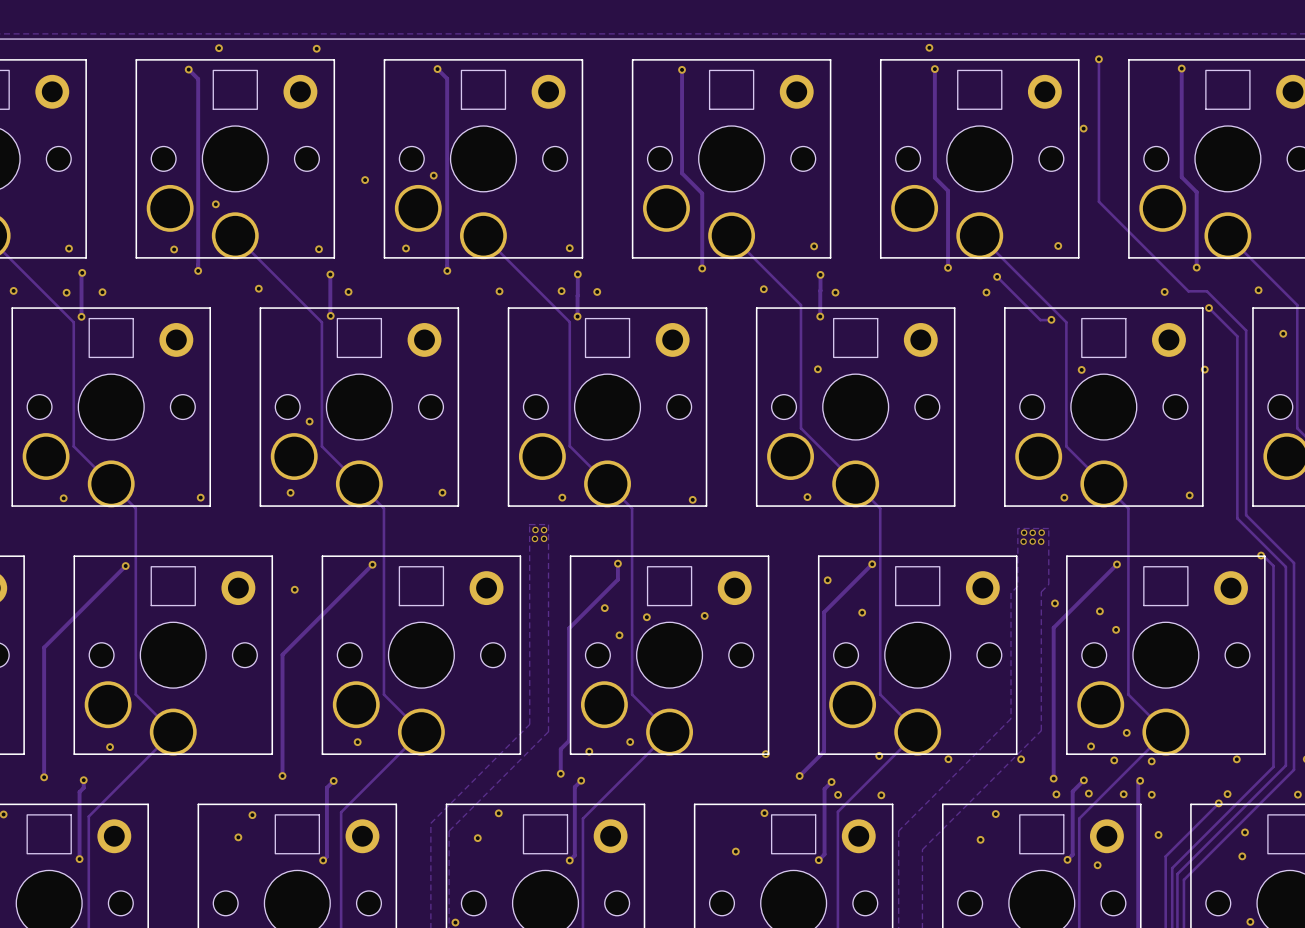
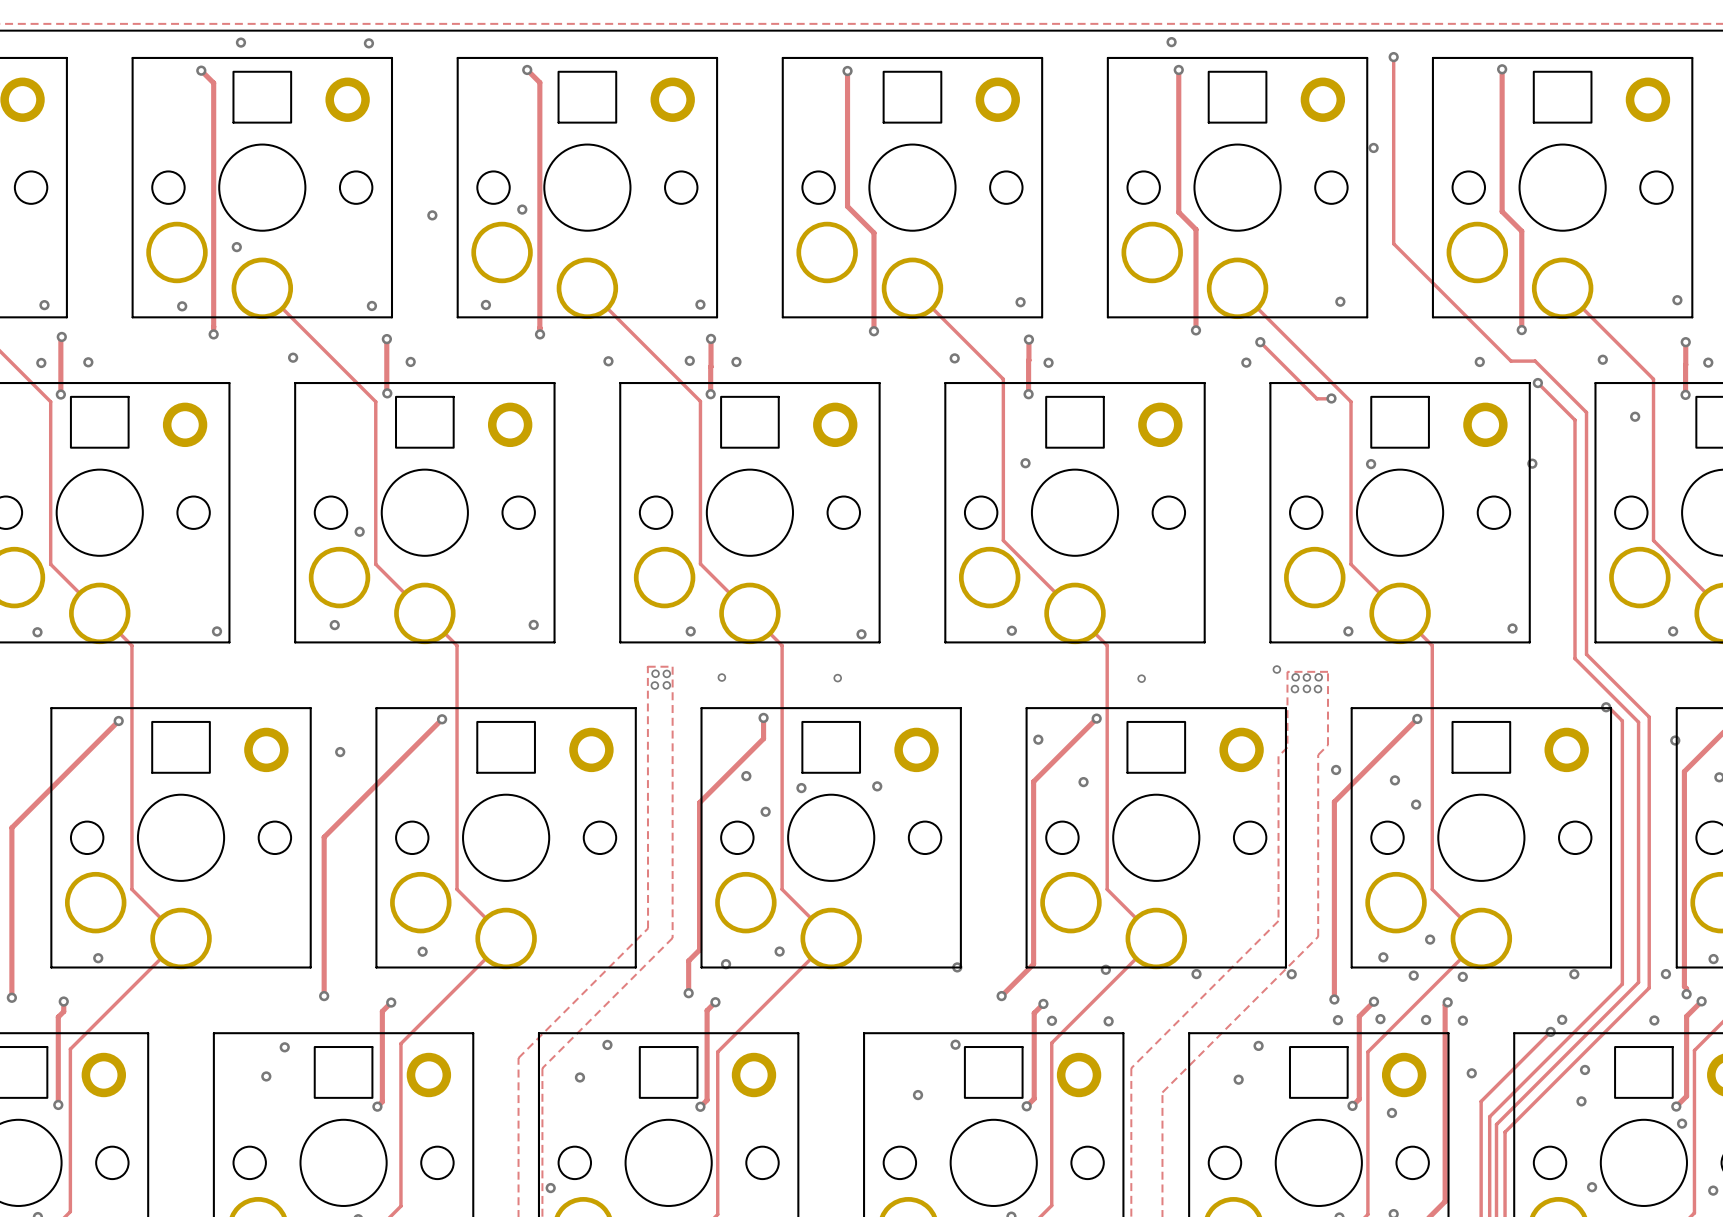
via: none -> (1276, 669)
via: none -> (721, 677)
via: none -> (837, 678)
via: none -> (1141, 678)

